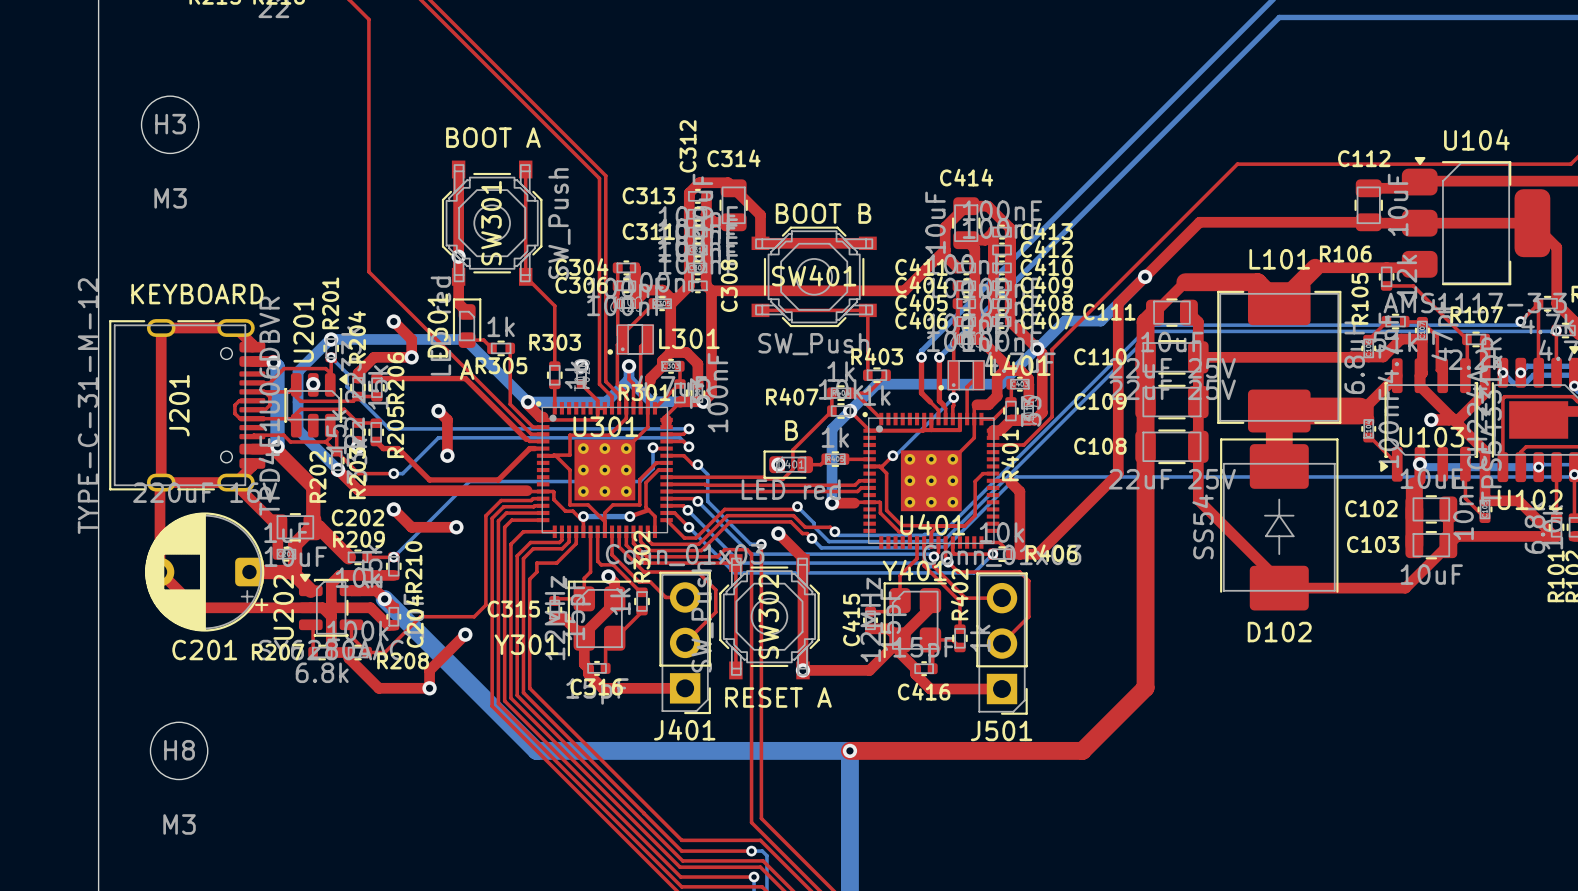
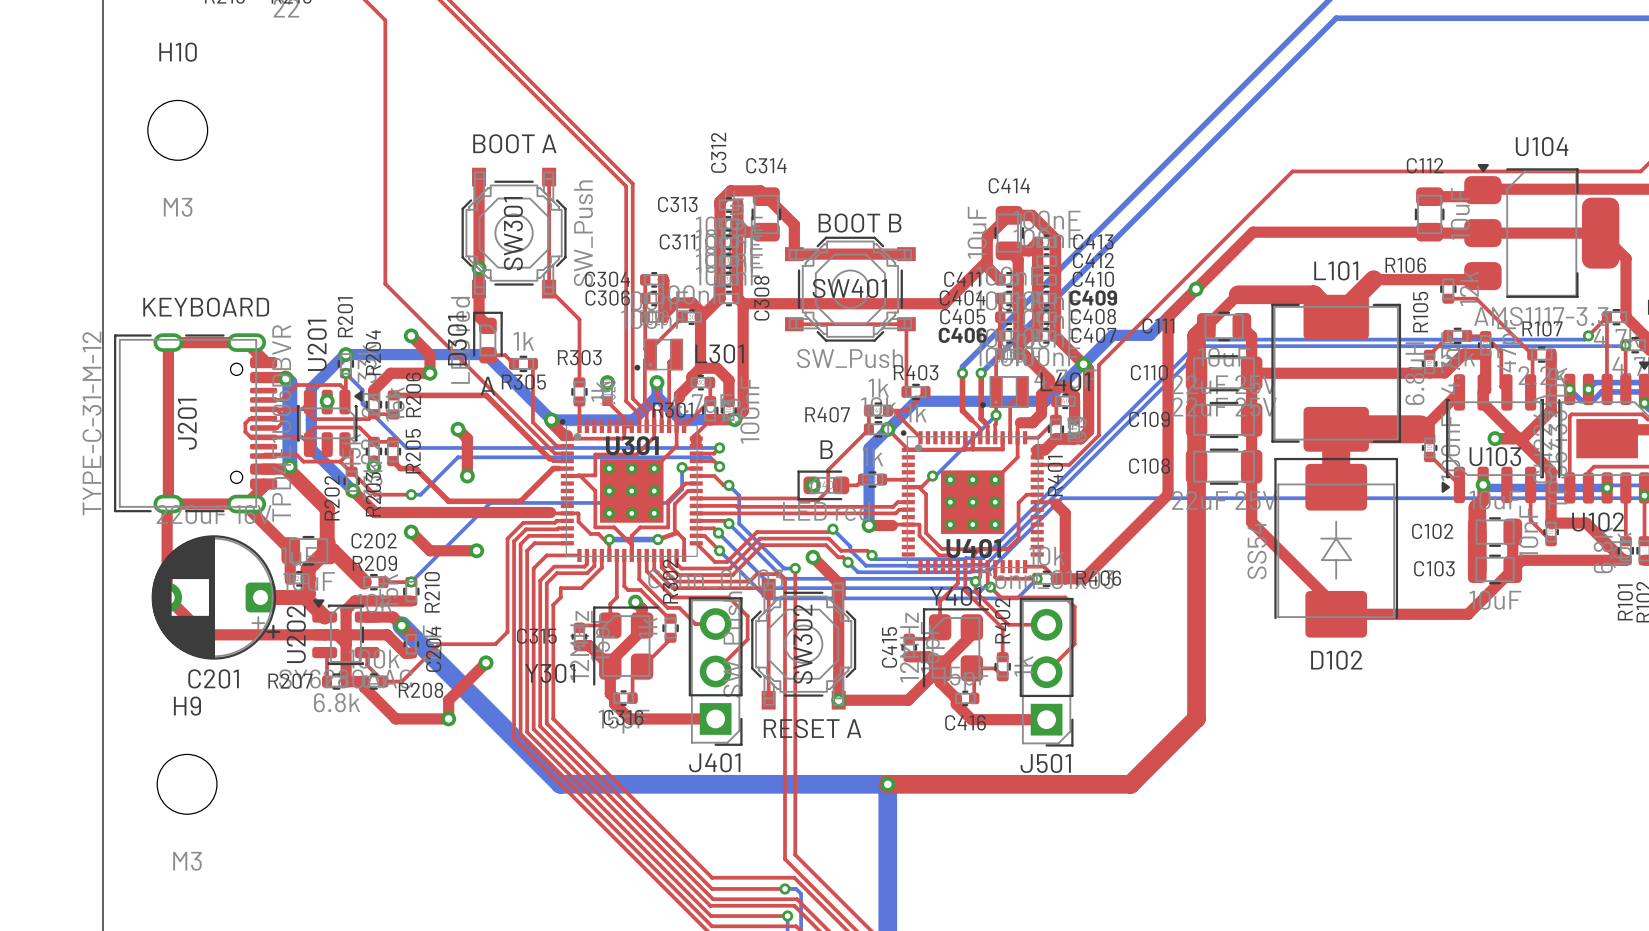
H3 name: H3 (170, 124) -> H10 (178, 52)
H8 name: H8 (179, 750) -> H9 (187, 706)

